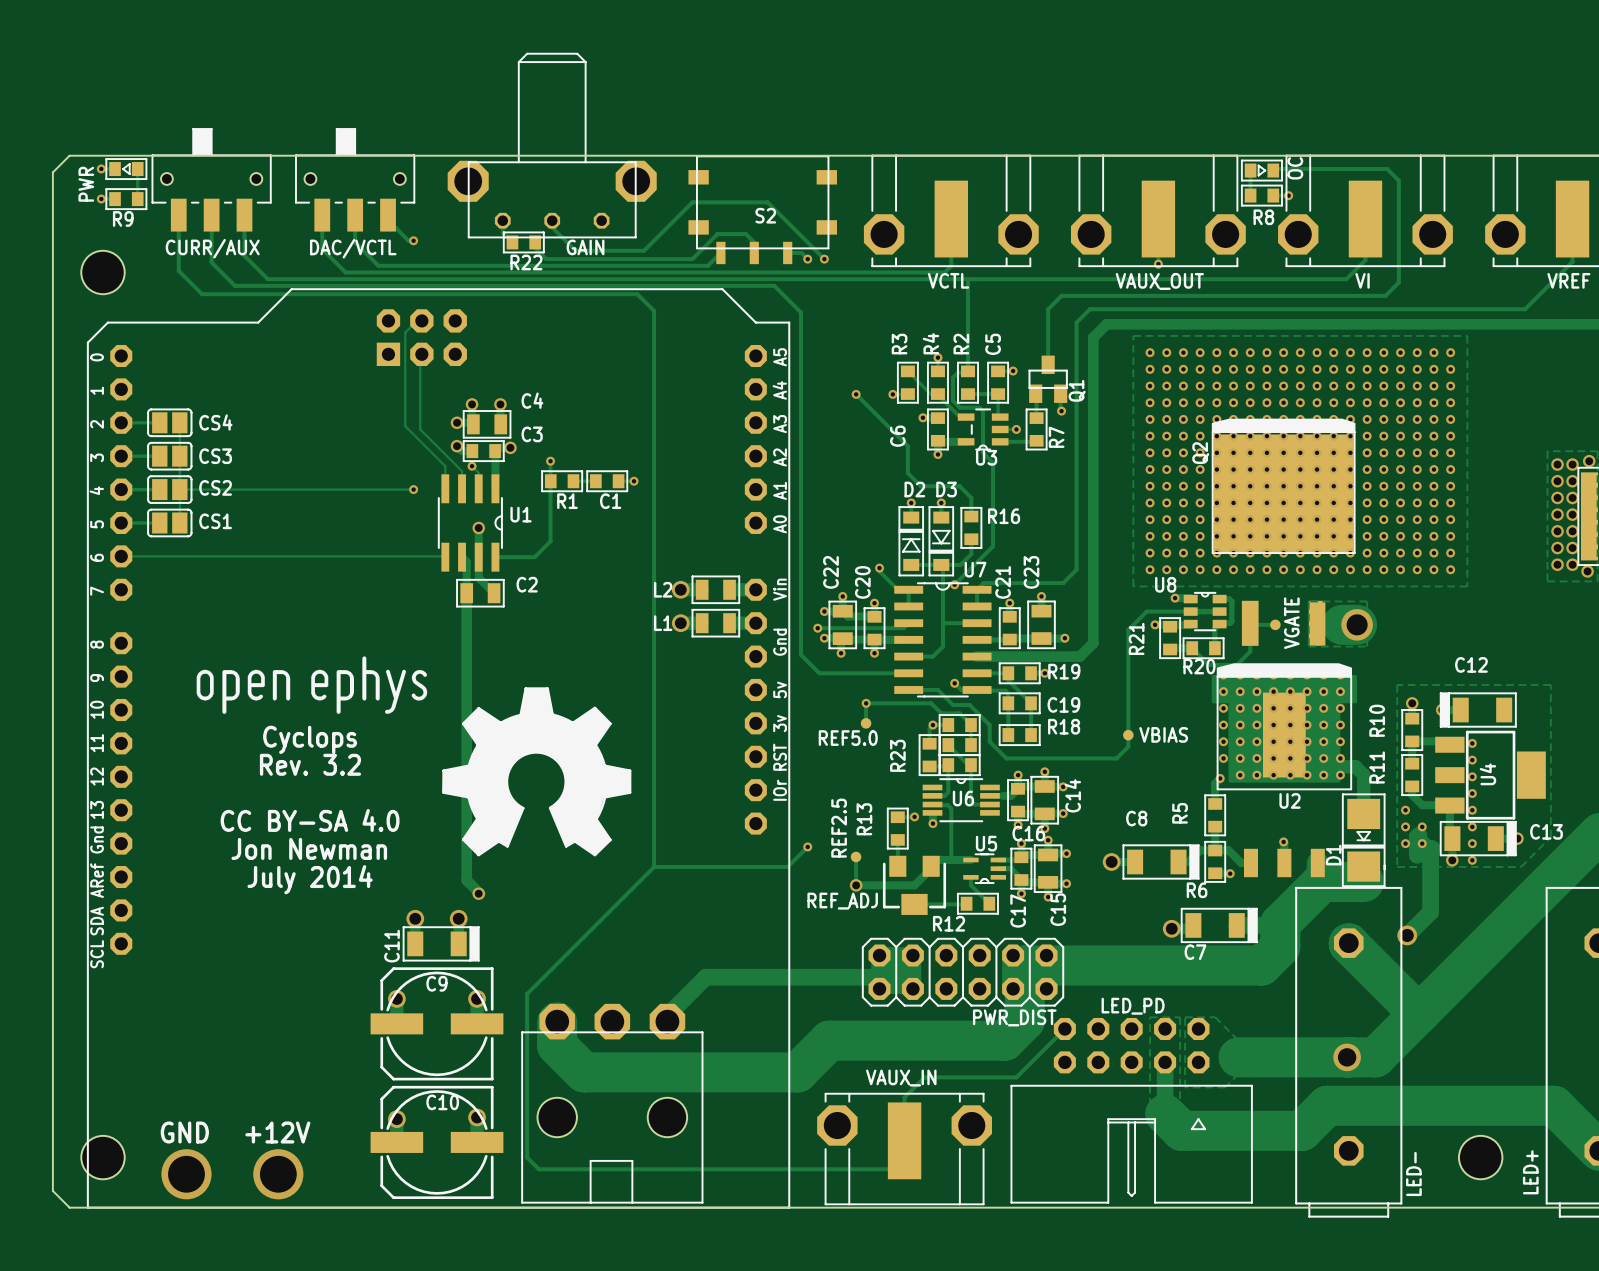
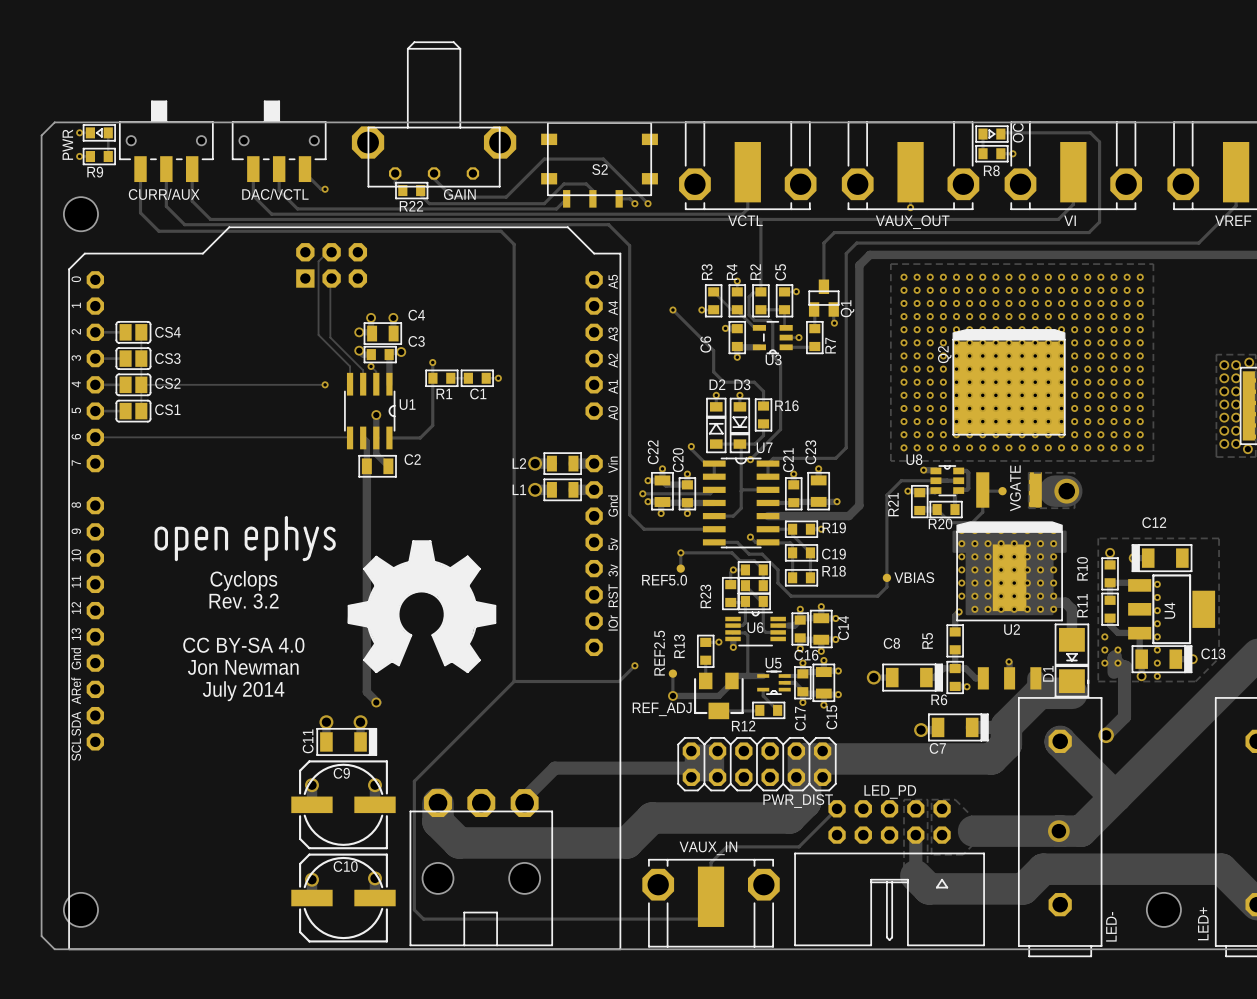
text: GND (184, 1132) -> none
text: +12V (277, 1132) -> none
via: (186, 1174) -> none
via: (278, 1174) -> none

